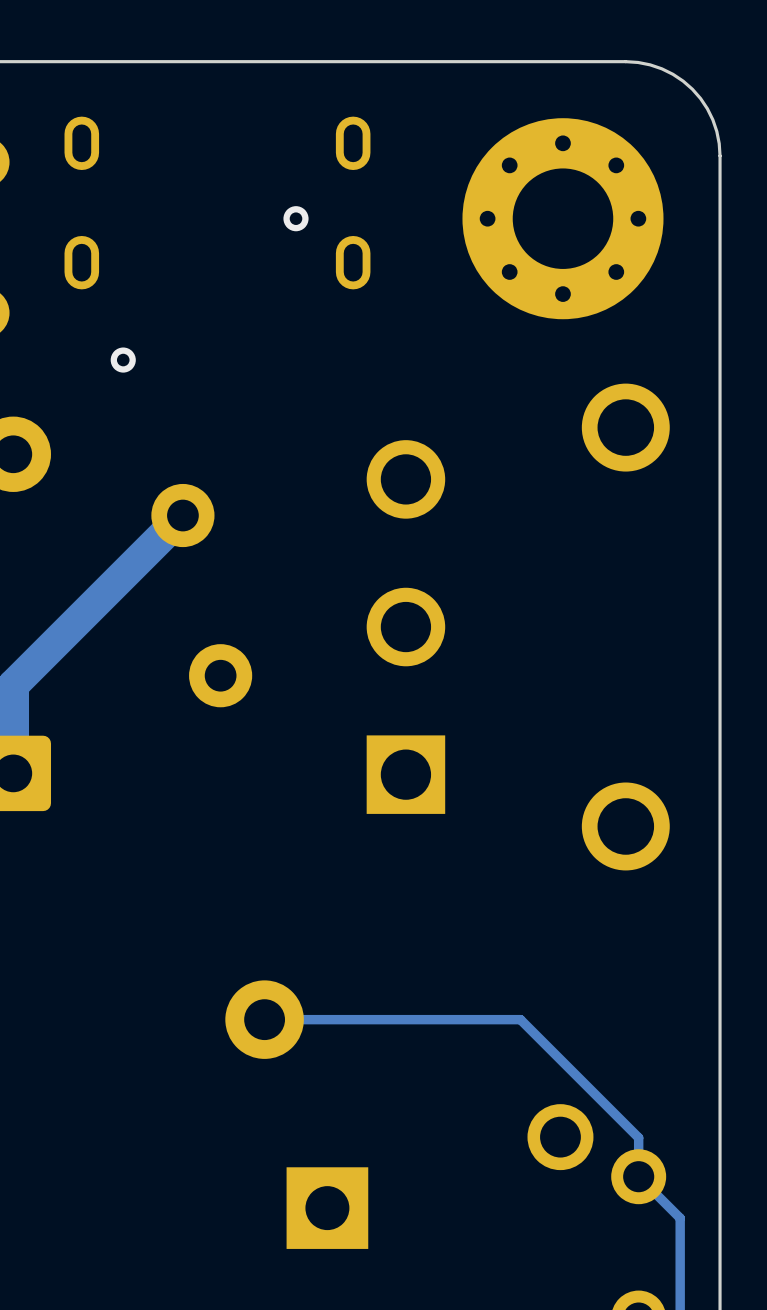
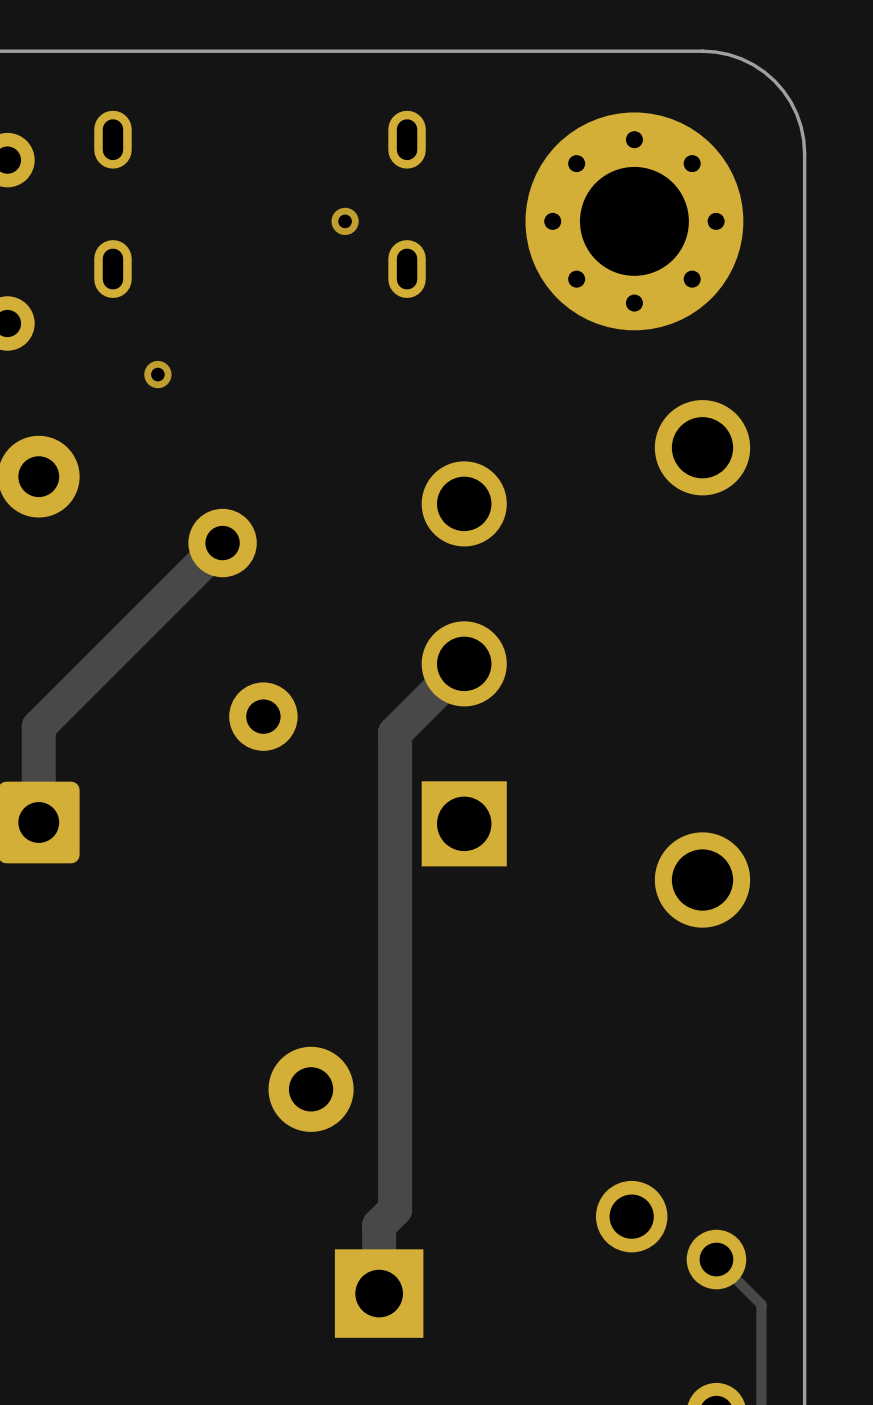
track: none -> (464, 663) (395, 733) (395, 1209) (379, 1225) (379, 1293)
track: (264, 1019) (520, 1019) (638, 1137) (638, 1176) -> none

